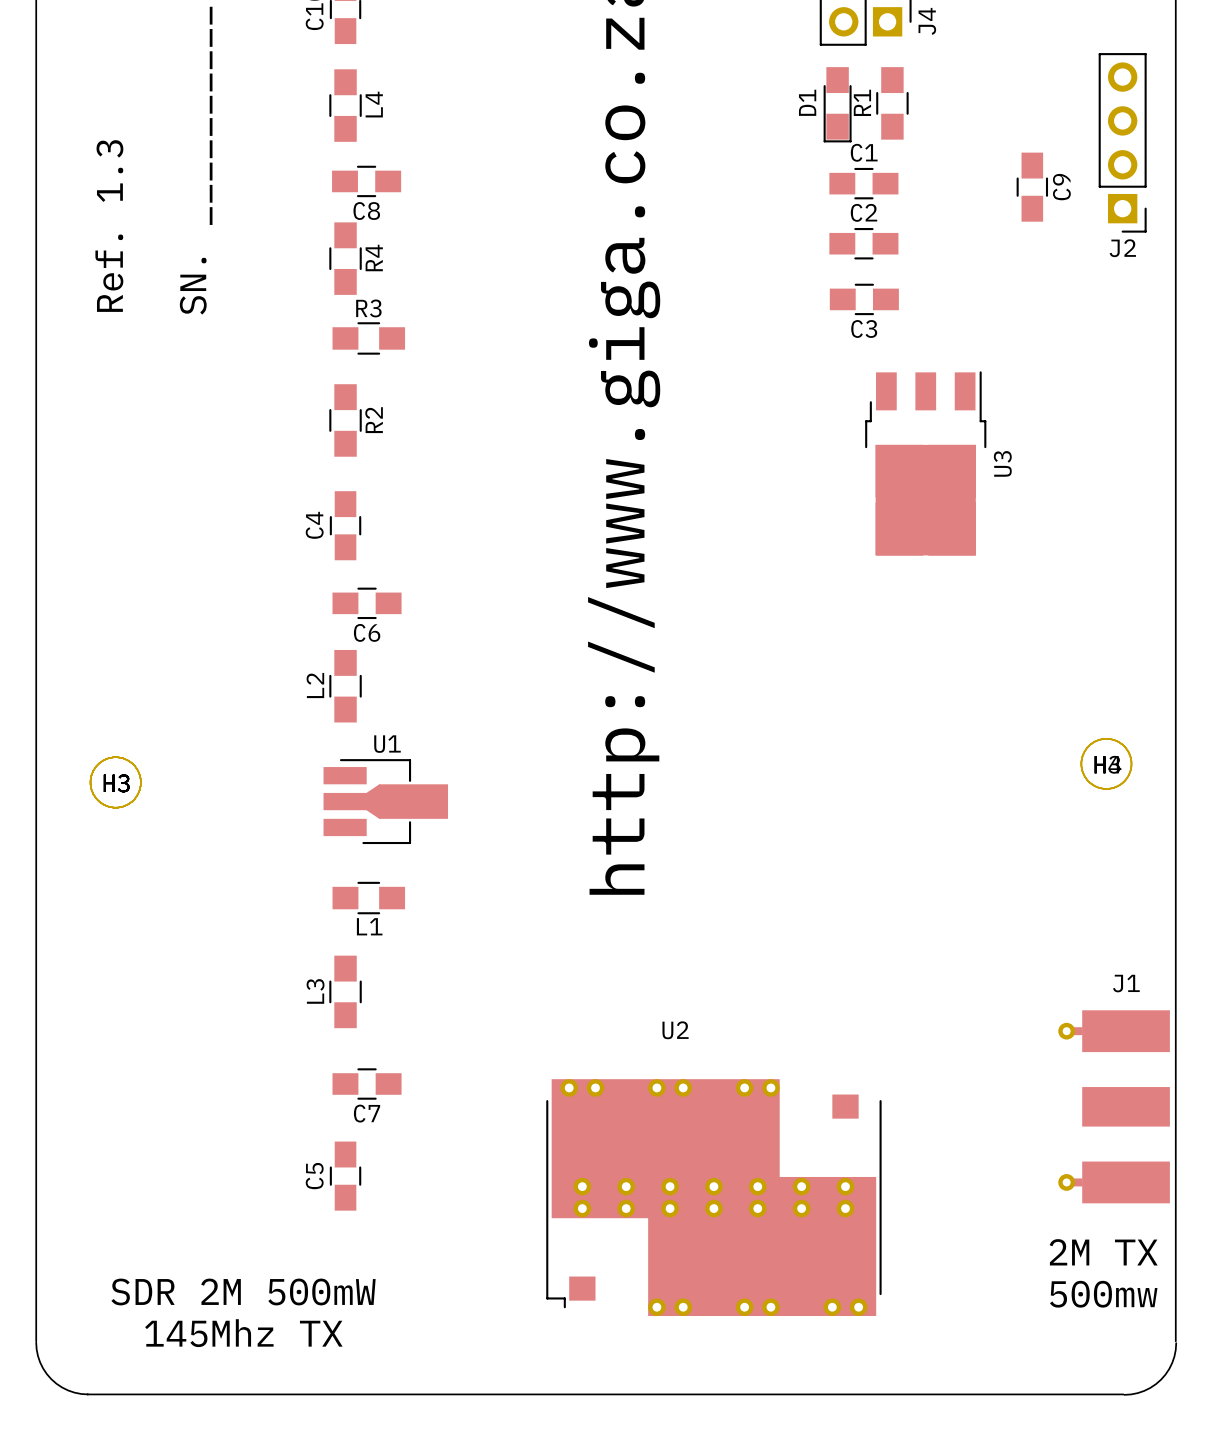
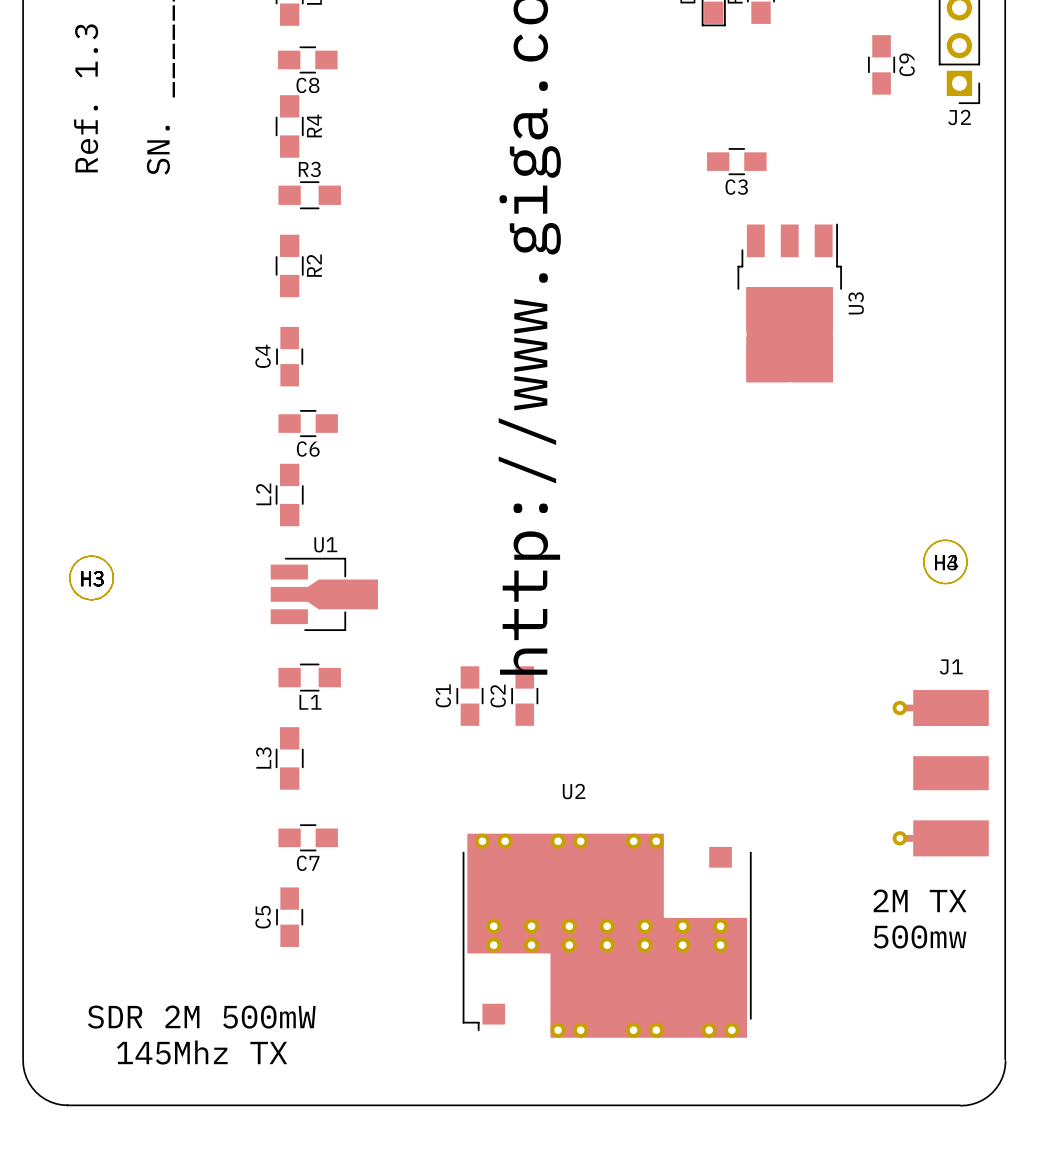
C1 name position: C1 (864, 152) -> C1 (443, 695)
C1 rotation: 0° (863, 183) -> 90° clockwise (469, 696)
C1 position: (863, 183) -> (469, 696)
C2 name position: C2 (864, 212) -> C2 (498, 696)
C2 rotation: 0° (863, 243) -> 90° clockwise (524, 696)
C2 position: (863, 243) -> (524, 696)
J1 position: (1114, 1106) -> (940, 773)
text position: 2M TX (1103, 1252) -> 2M TX (920, 900)
text position: 500mw (1103, 1294) -> 500mw (920, 936)

